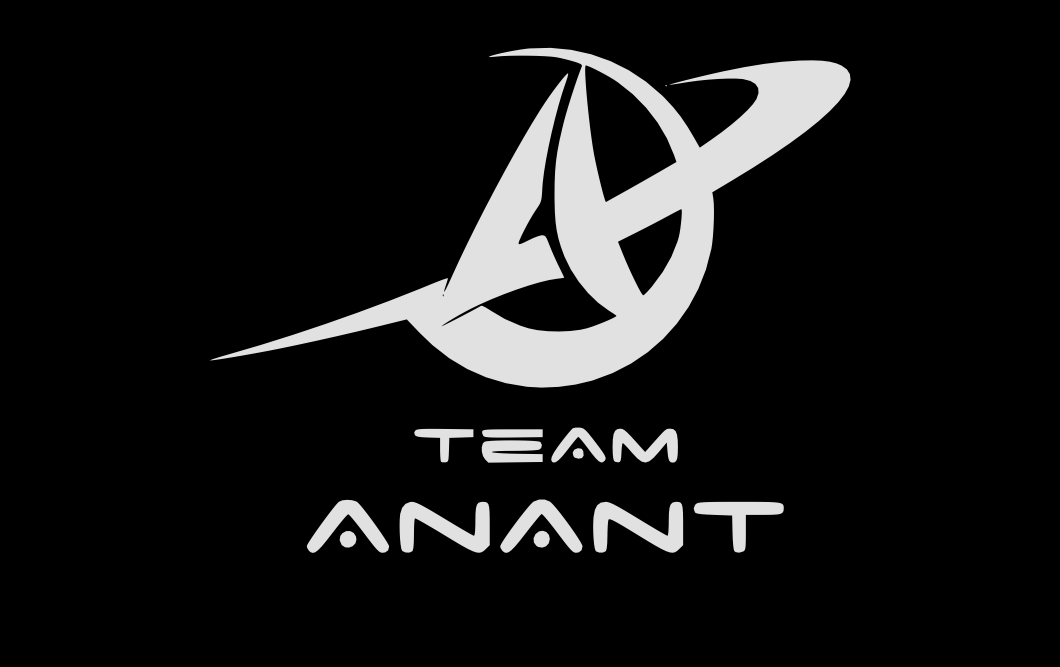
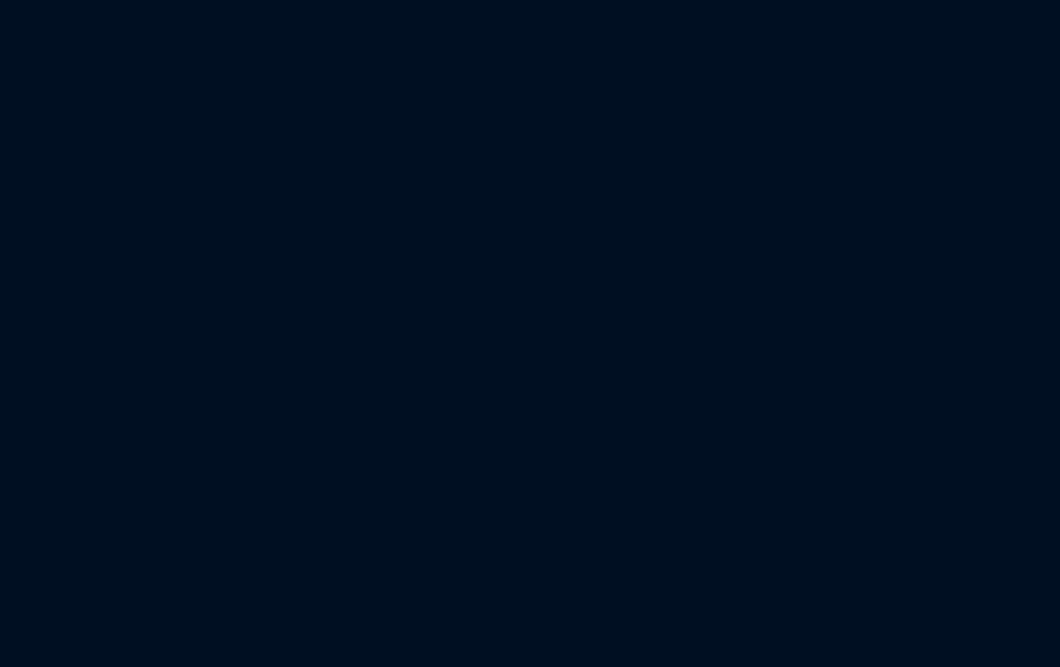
drawing: [209, 47, 851, 553] -> none

